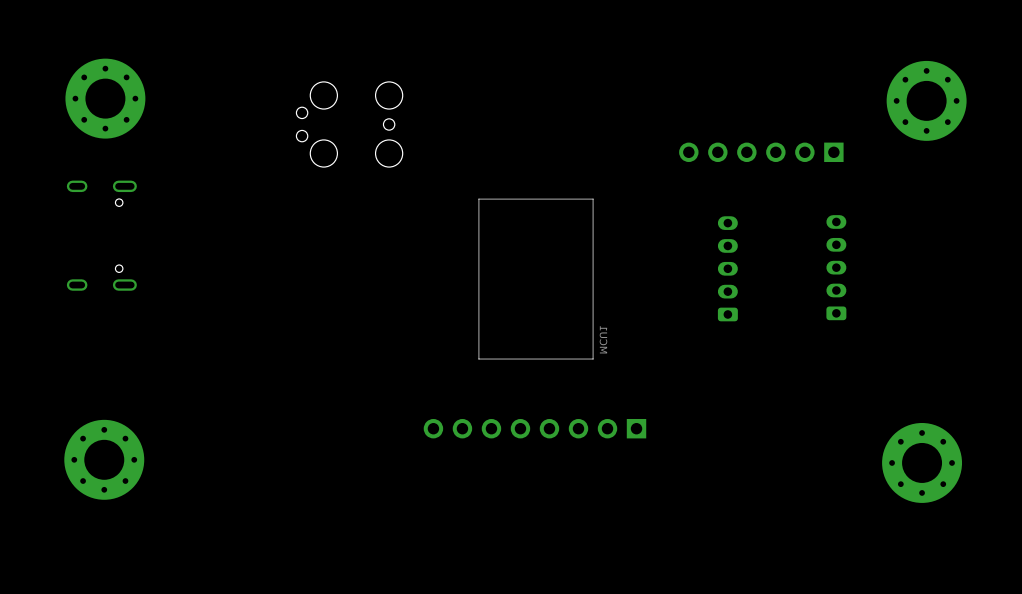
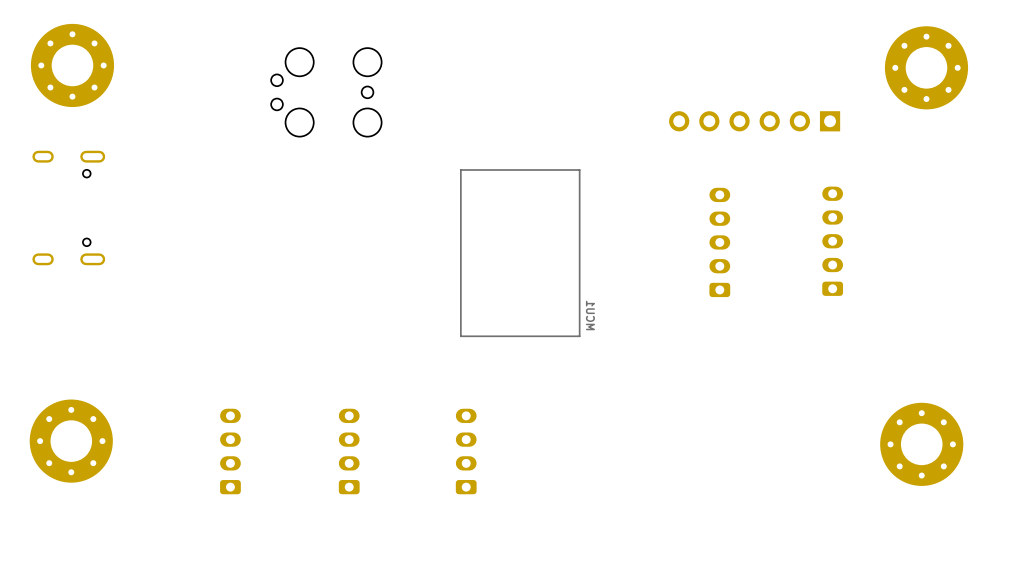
part: (534, 428) -> none
part: none -> (230, 451)
part: none -> (349, 451)
part: none -> (466, 451)

